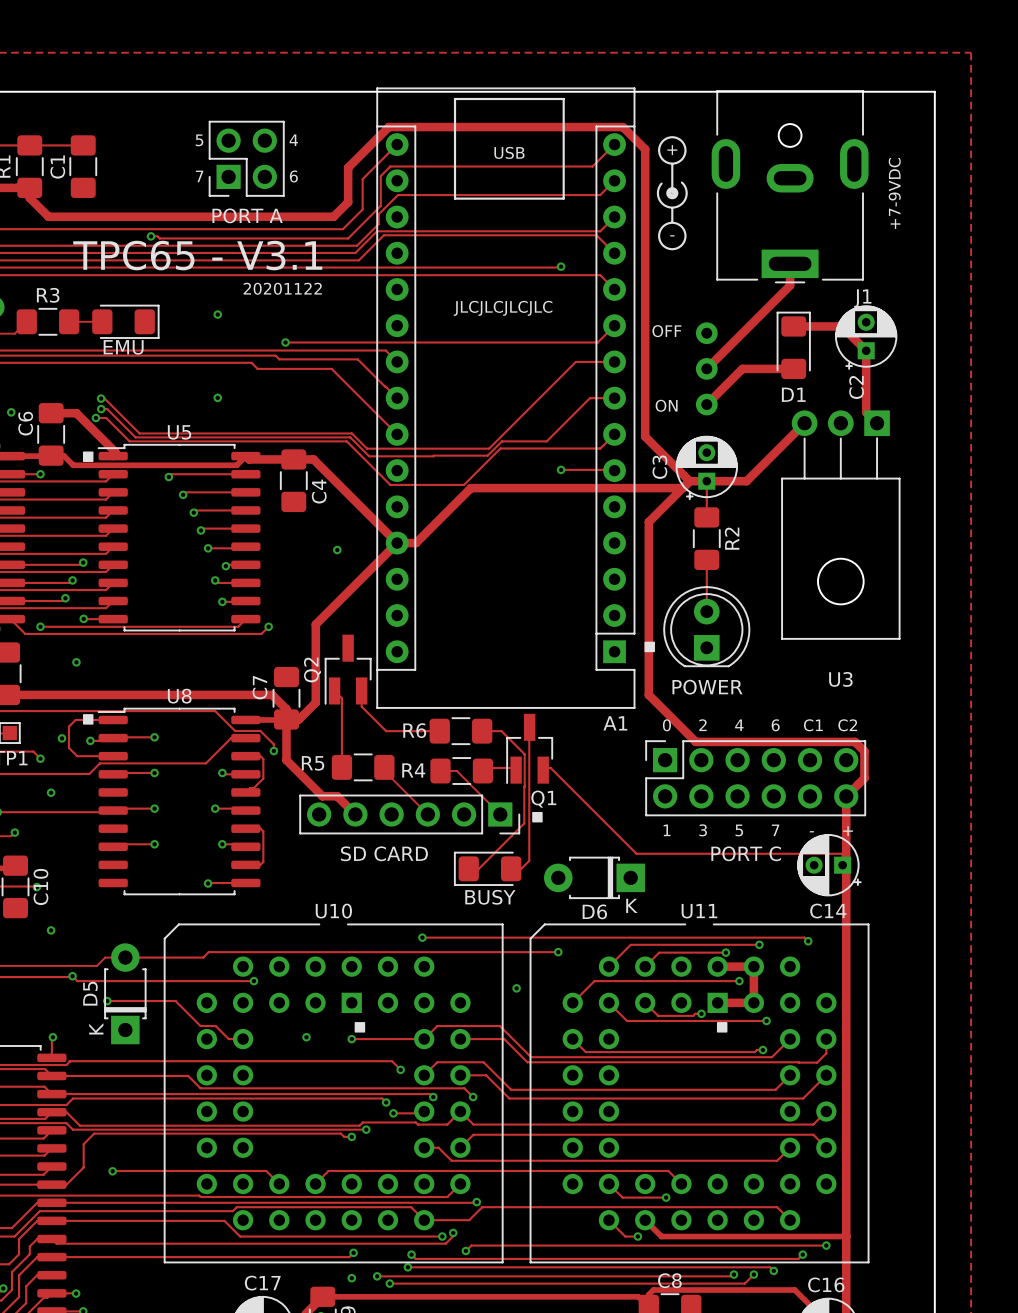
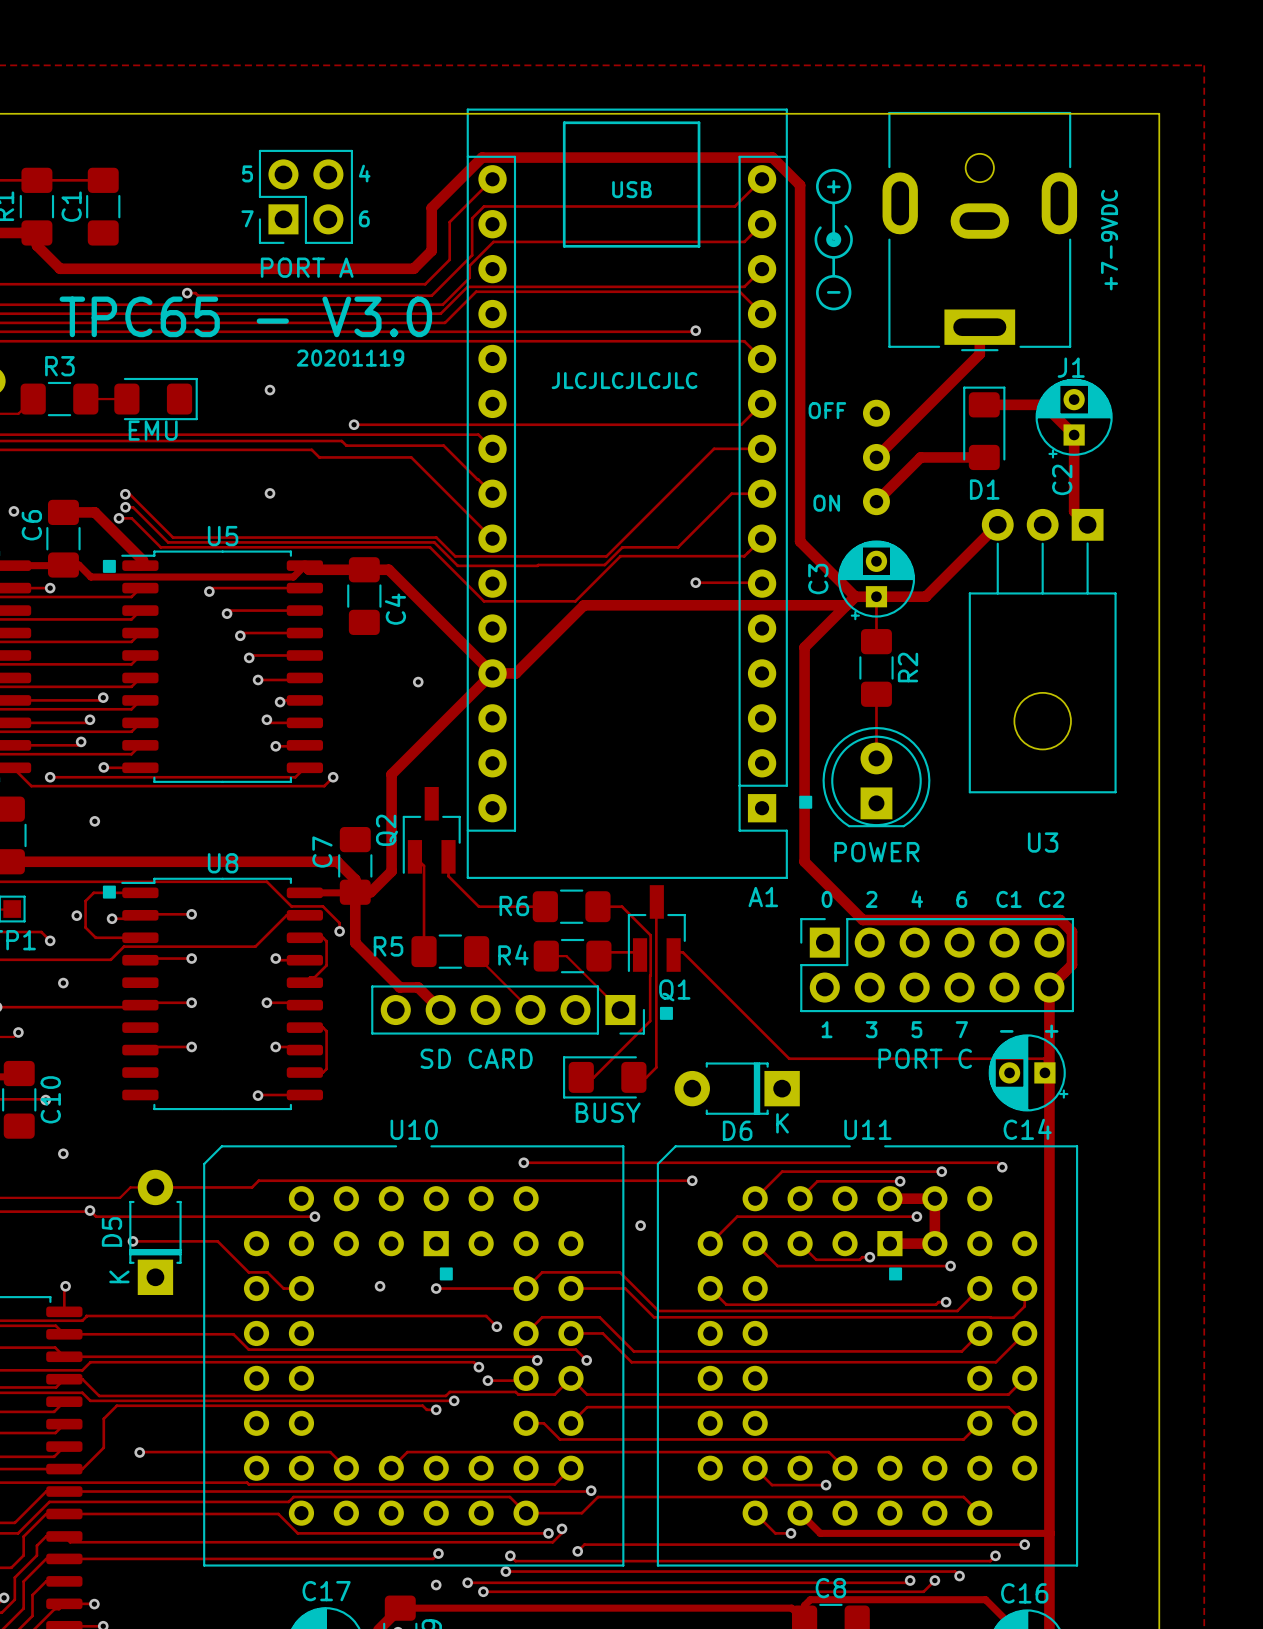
text: TPC65 - V3.1 (197, 255) -> TPC65 - V3.0 (245, 316)
text: 20201122 (282, 288) -> 20201119 (350, 358)

